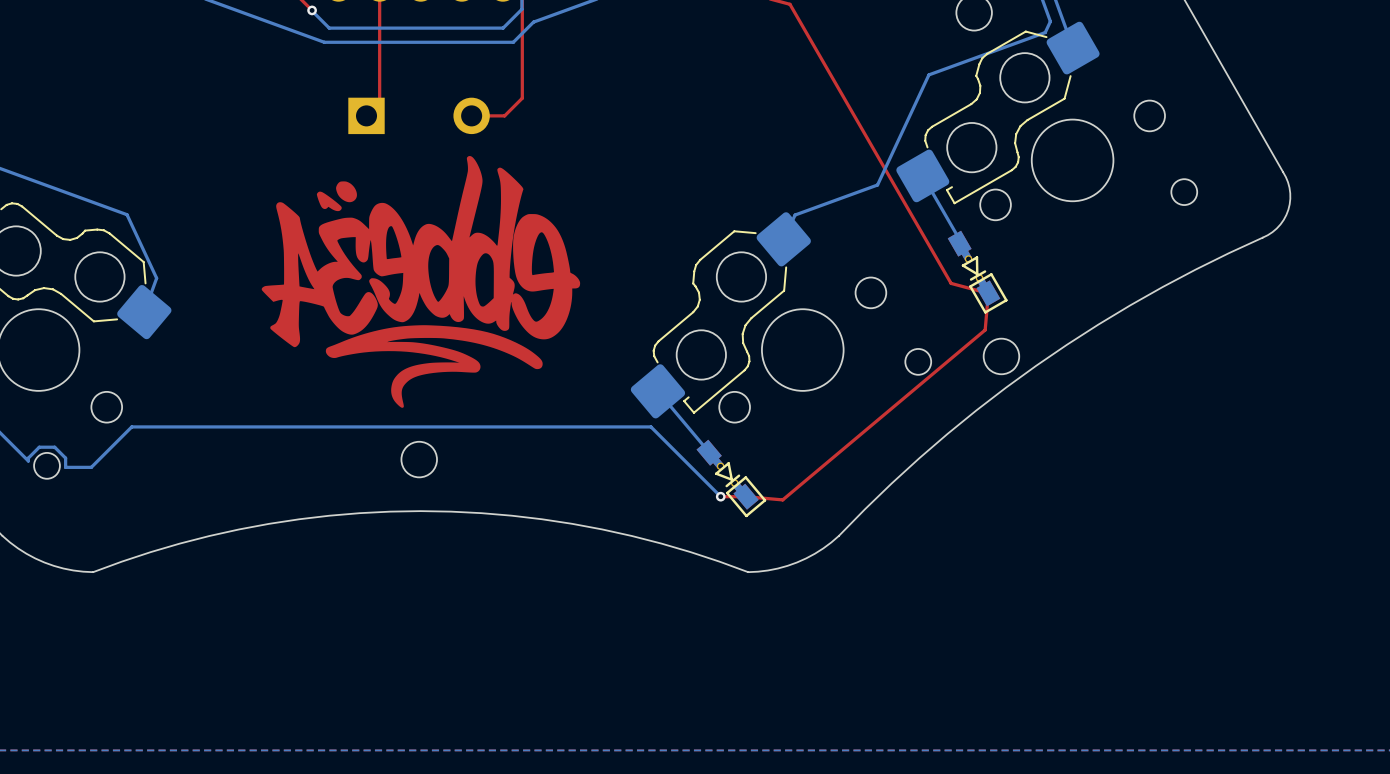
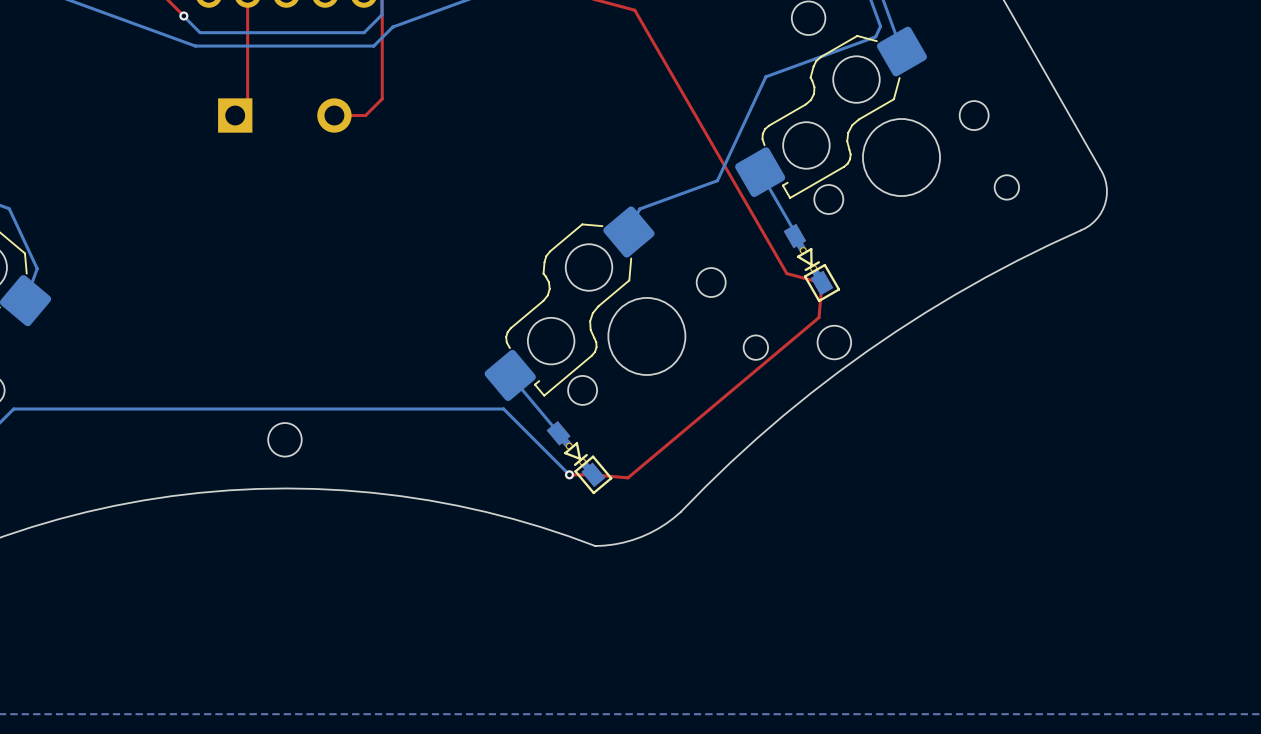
drawing: [261, 156, 581, 408] -> none

